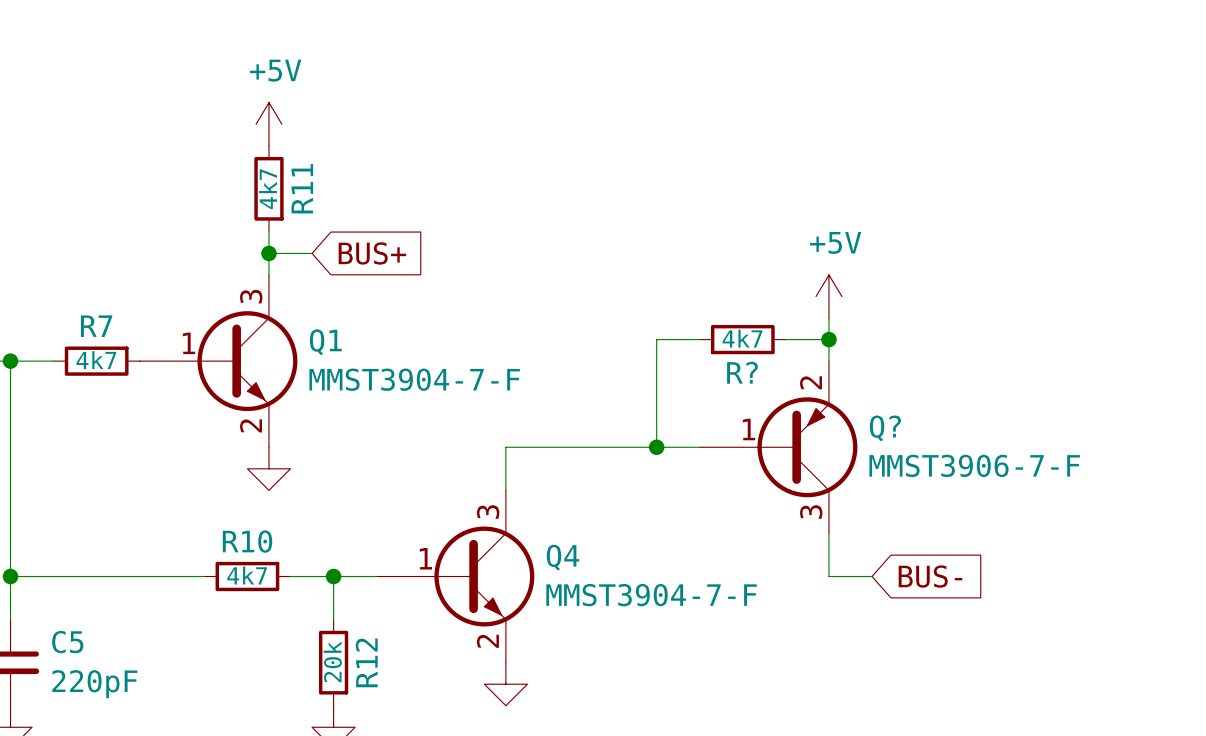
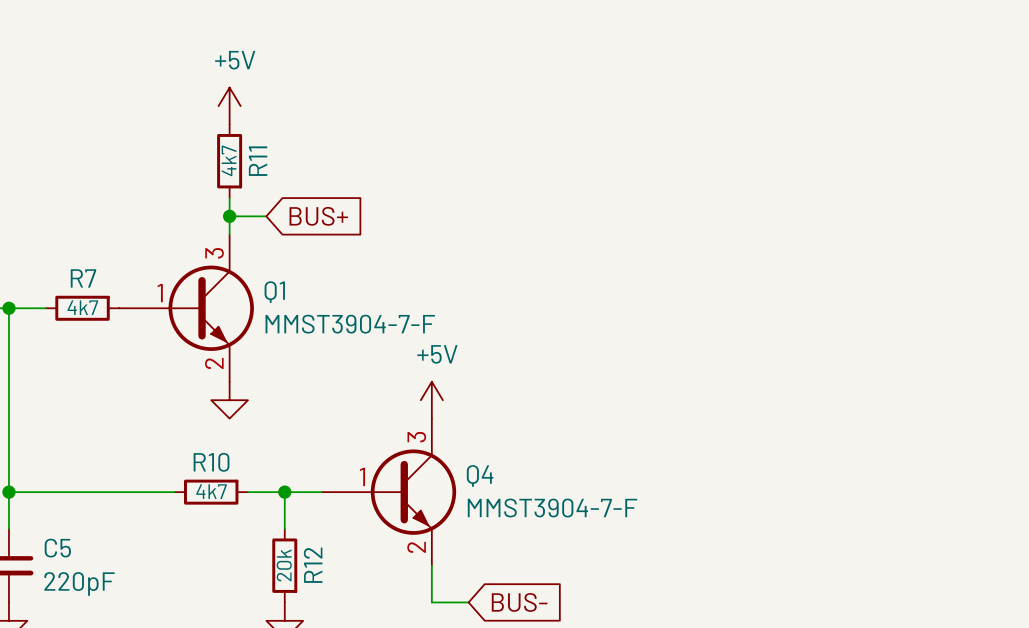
power symbol position: +5V (828, 296) -> +5V (431, 400)
wire: (828, 318) (828, 361) -> none
wire: (699, 339) (656, 339) (656, 447) -> none
R?: 4k7 (742, 339) -> none
wire: (785, 339) (828, 339) -> none
junction: (828, 339) -> none
junction: (656, 447) -> none
wire: (699, 447) (505, 447) (505, 490) -> none
Q?: MMST3906-7-F (778, 447) -> none
wire: (828, 533) (828, 576) (872, 576) -> (431, 565) (431, 602) (468, 602)
global label position: BUS- (930, 576) -> BUS- (519, 602)
power symbol: (505, 684) -> none

